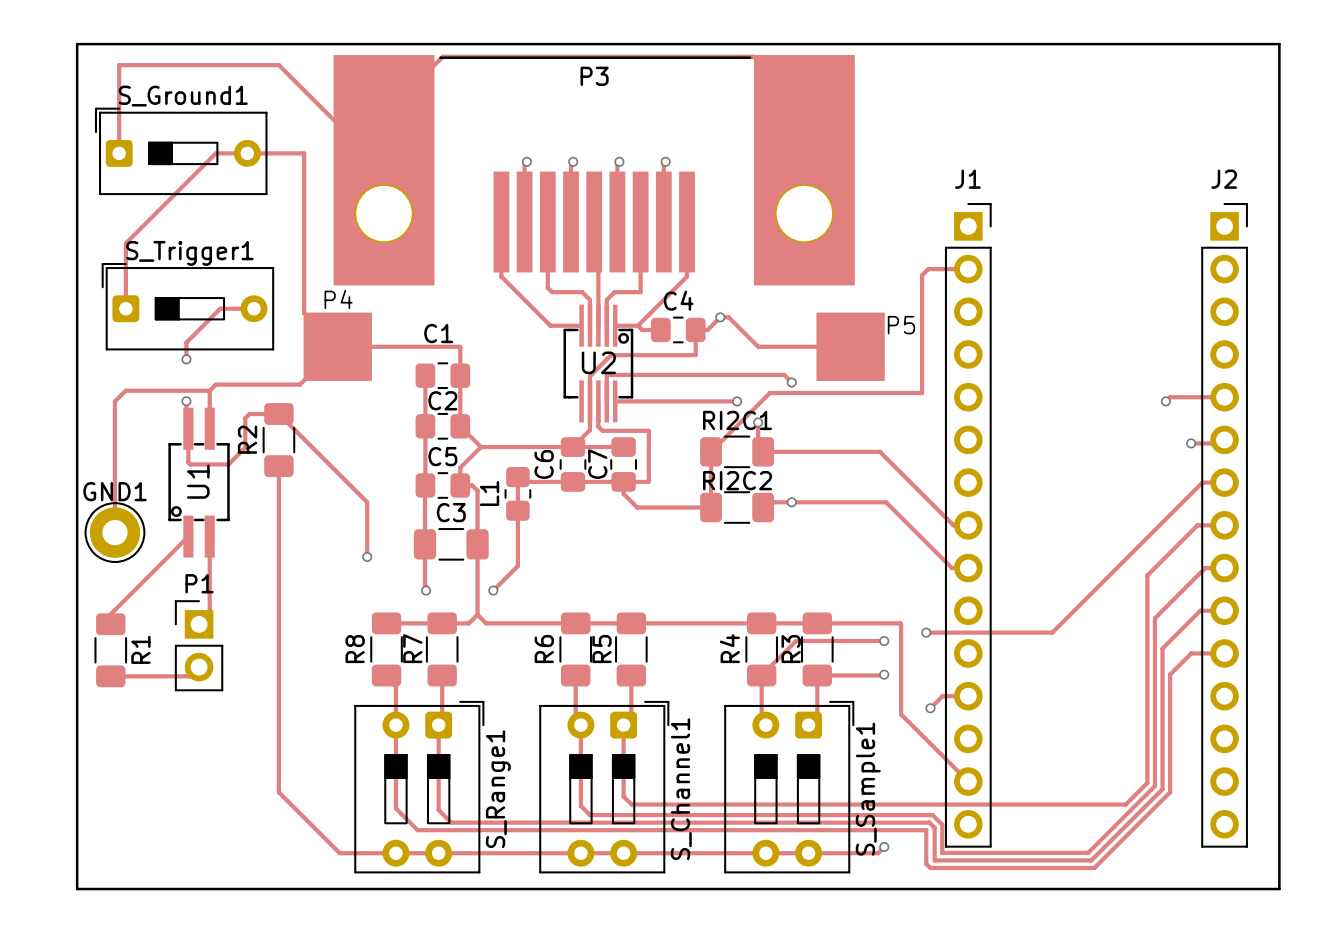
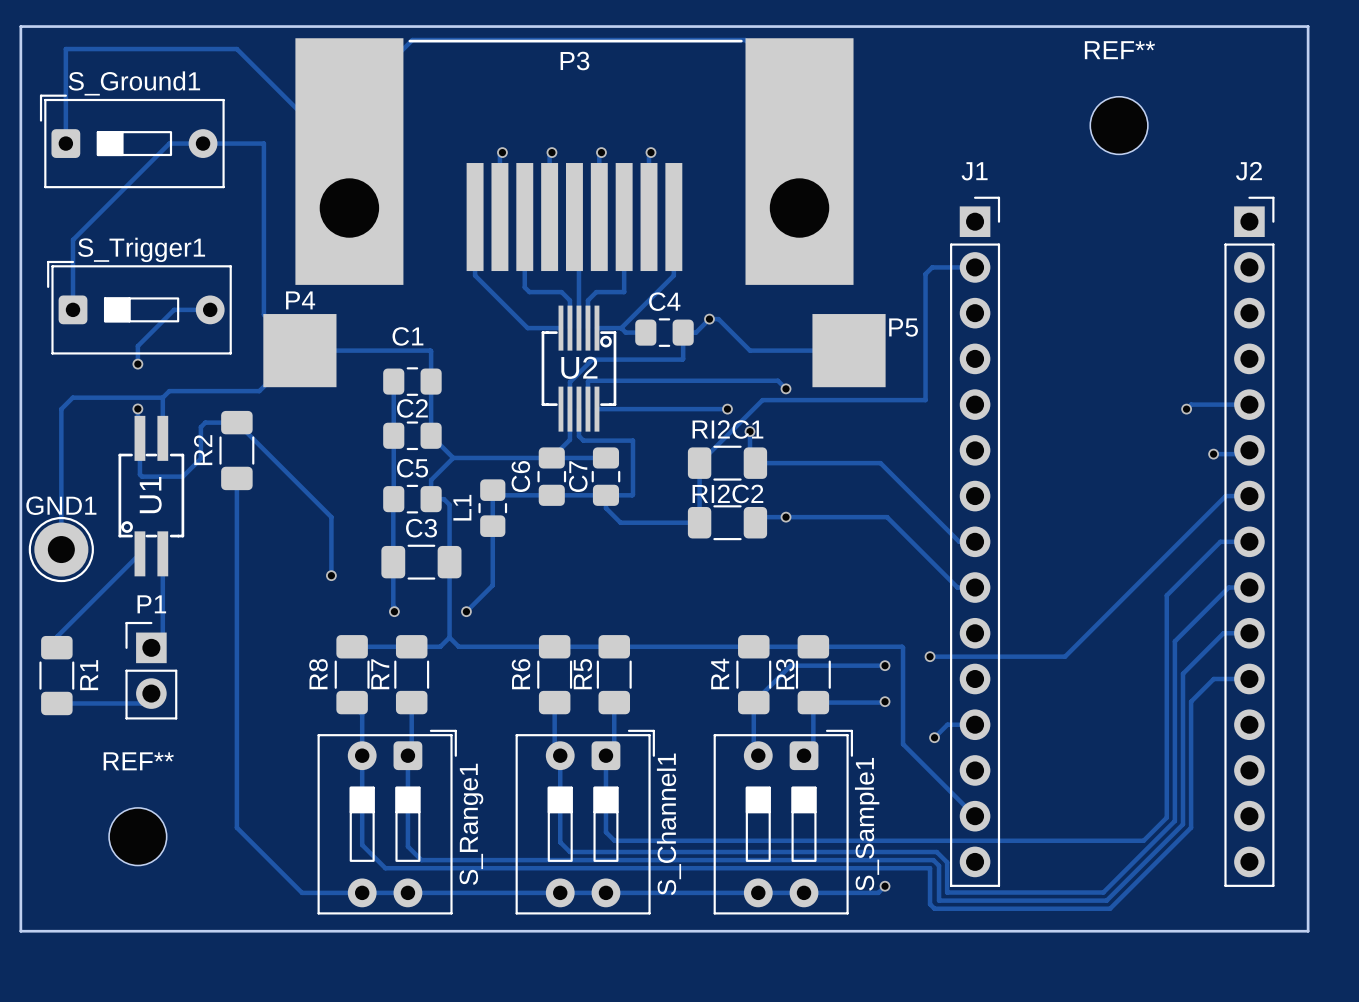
REF**: none -> (1119, 125)
REF**: none -> (137, 836)

